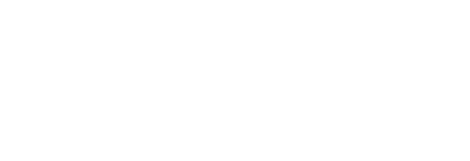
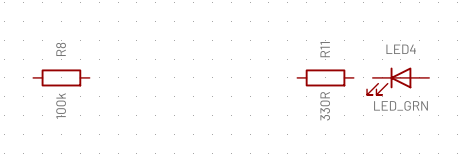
R8: none -> 100k (61, 77)
R11: none -> 330R (325, 77)
LED4: none -> LED_GRN (398, 81)

